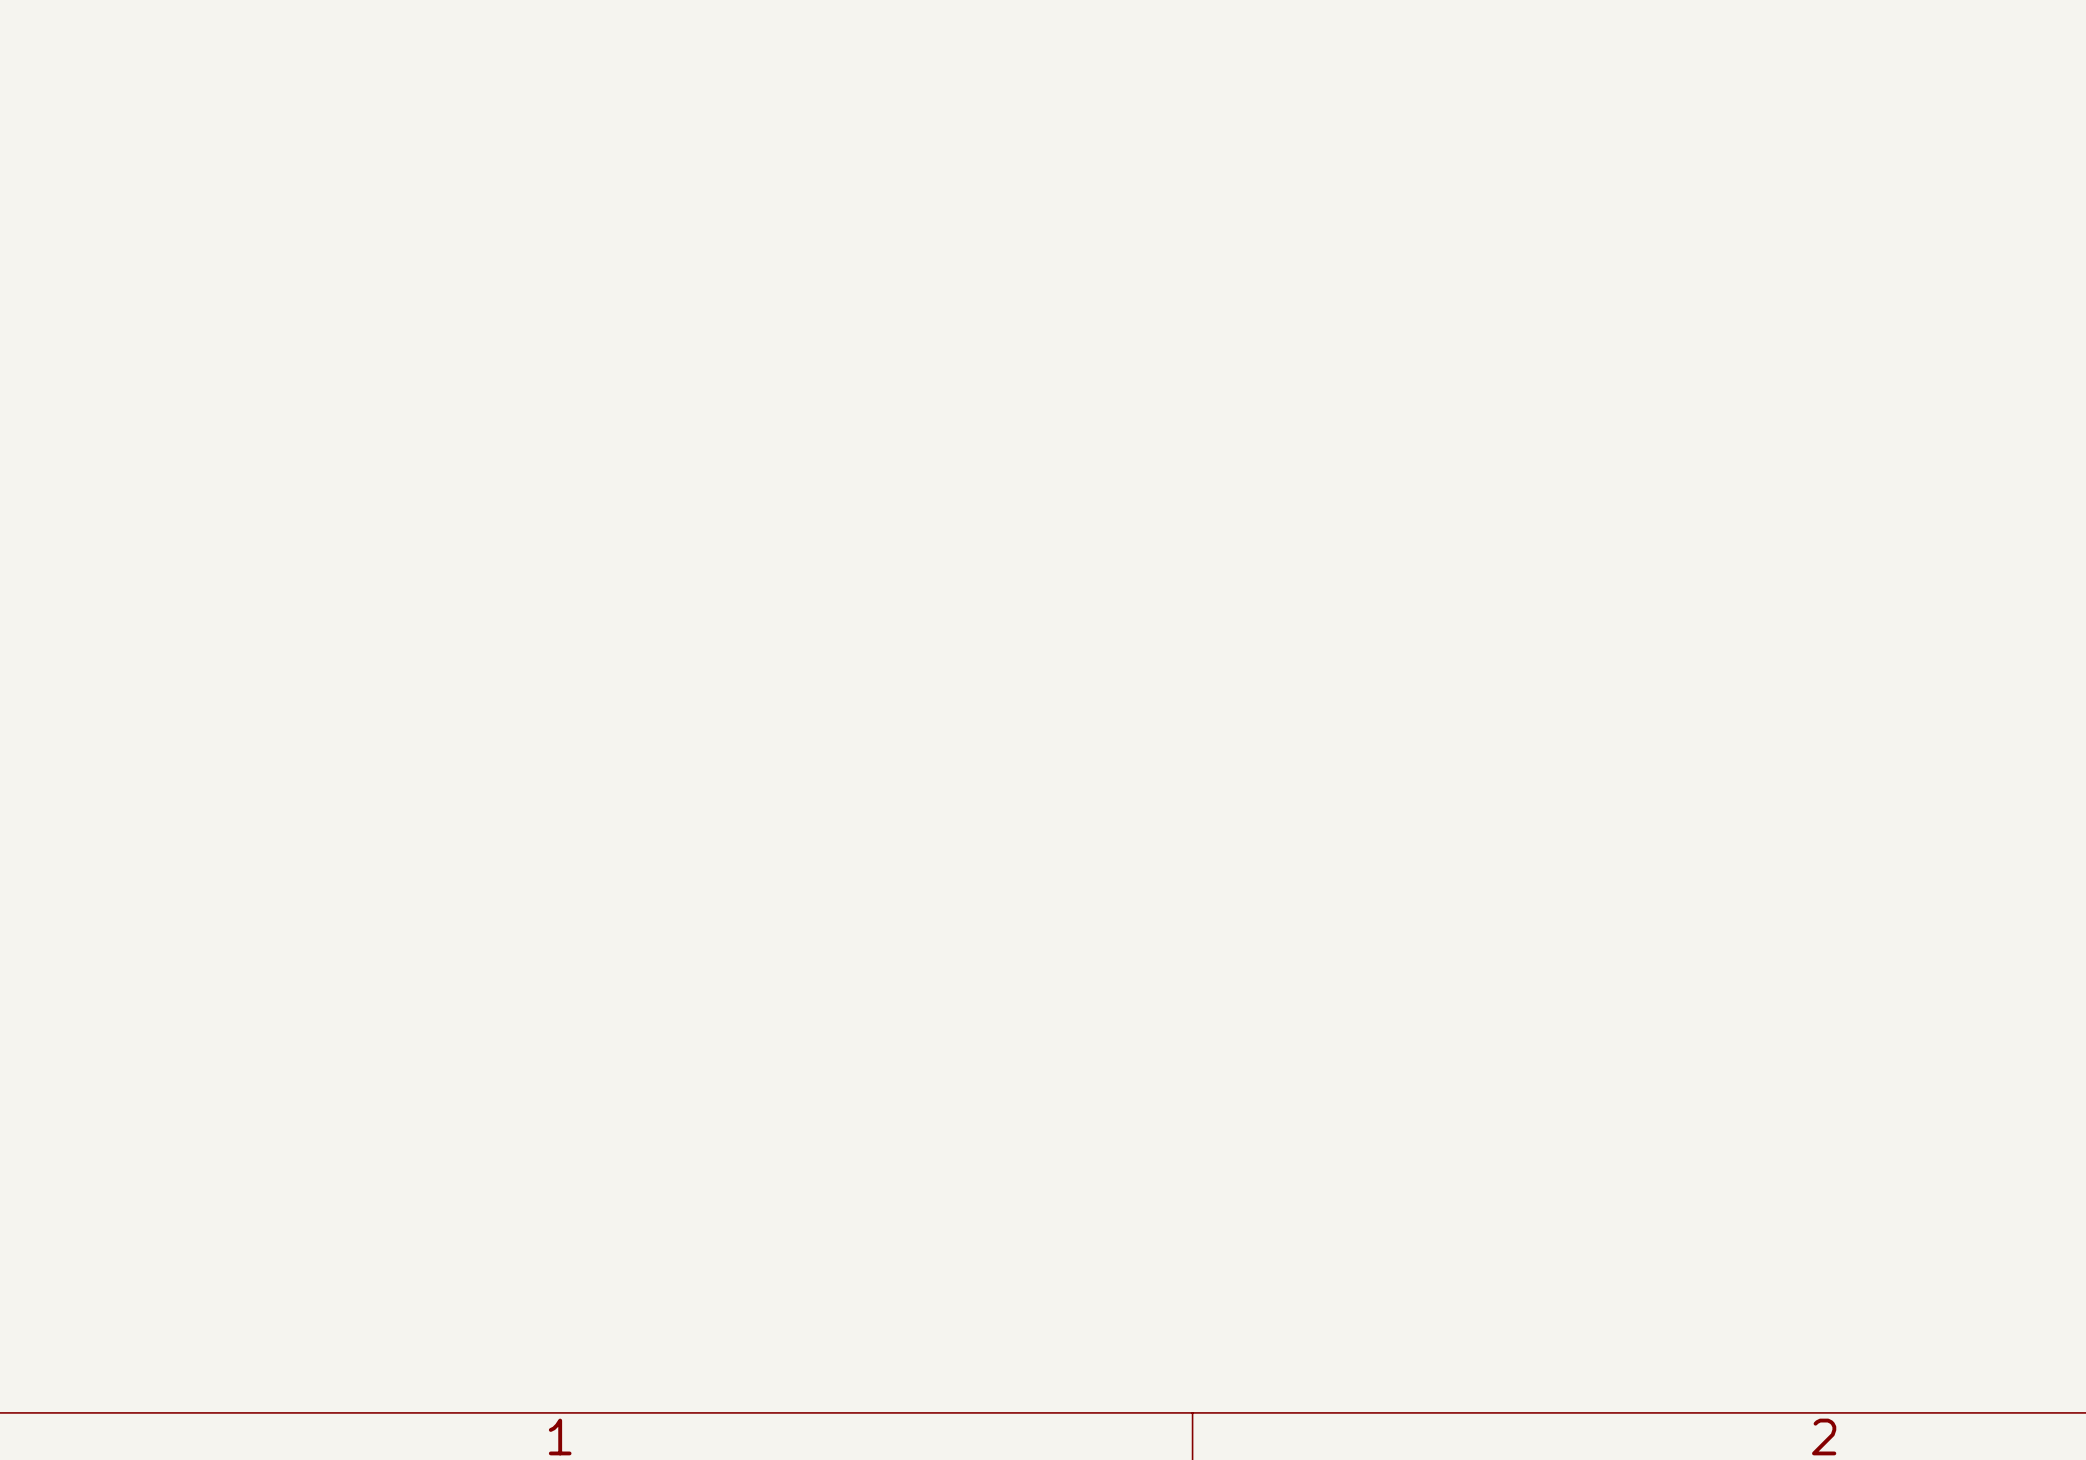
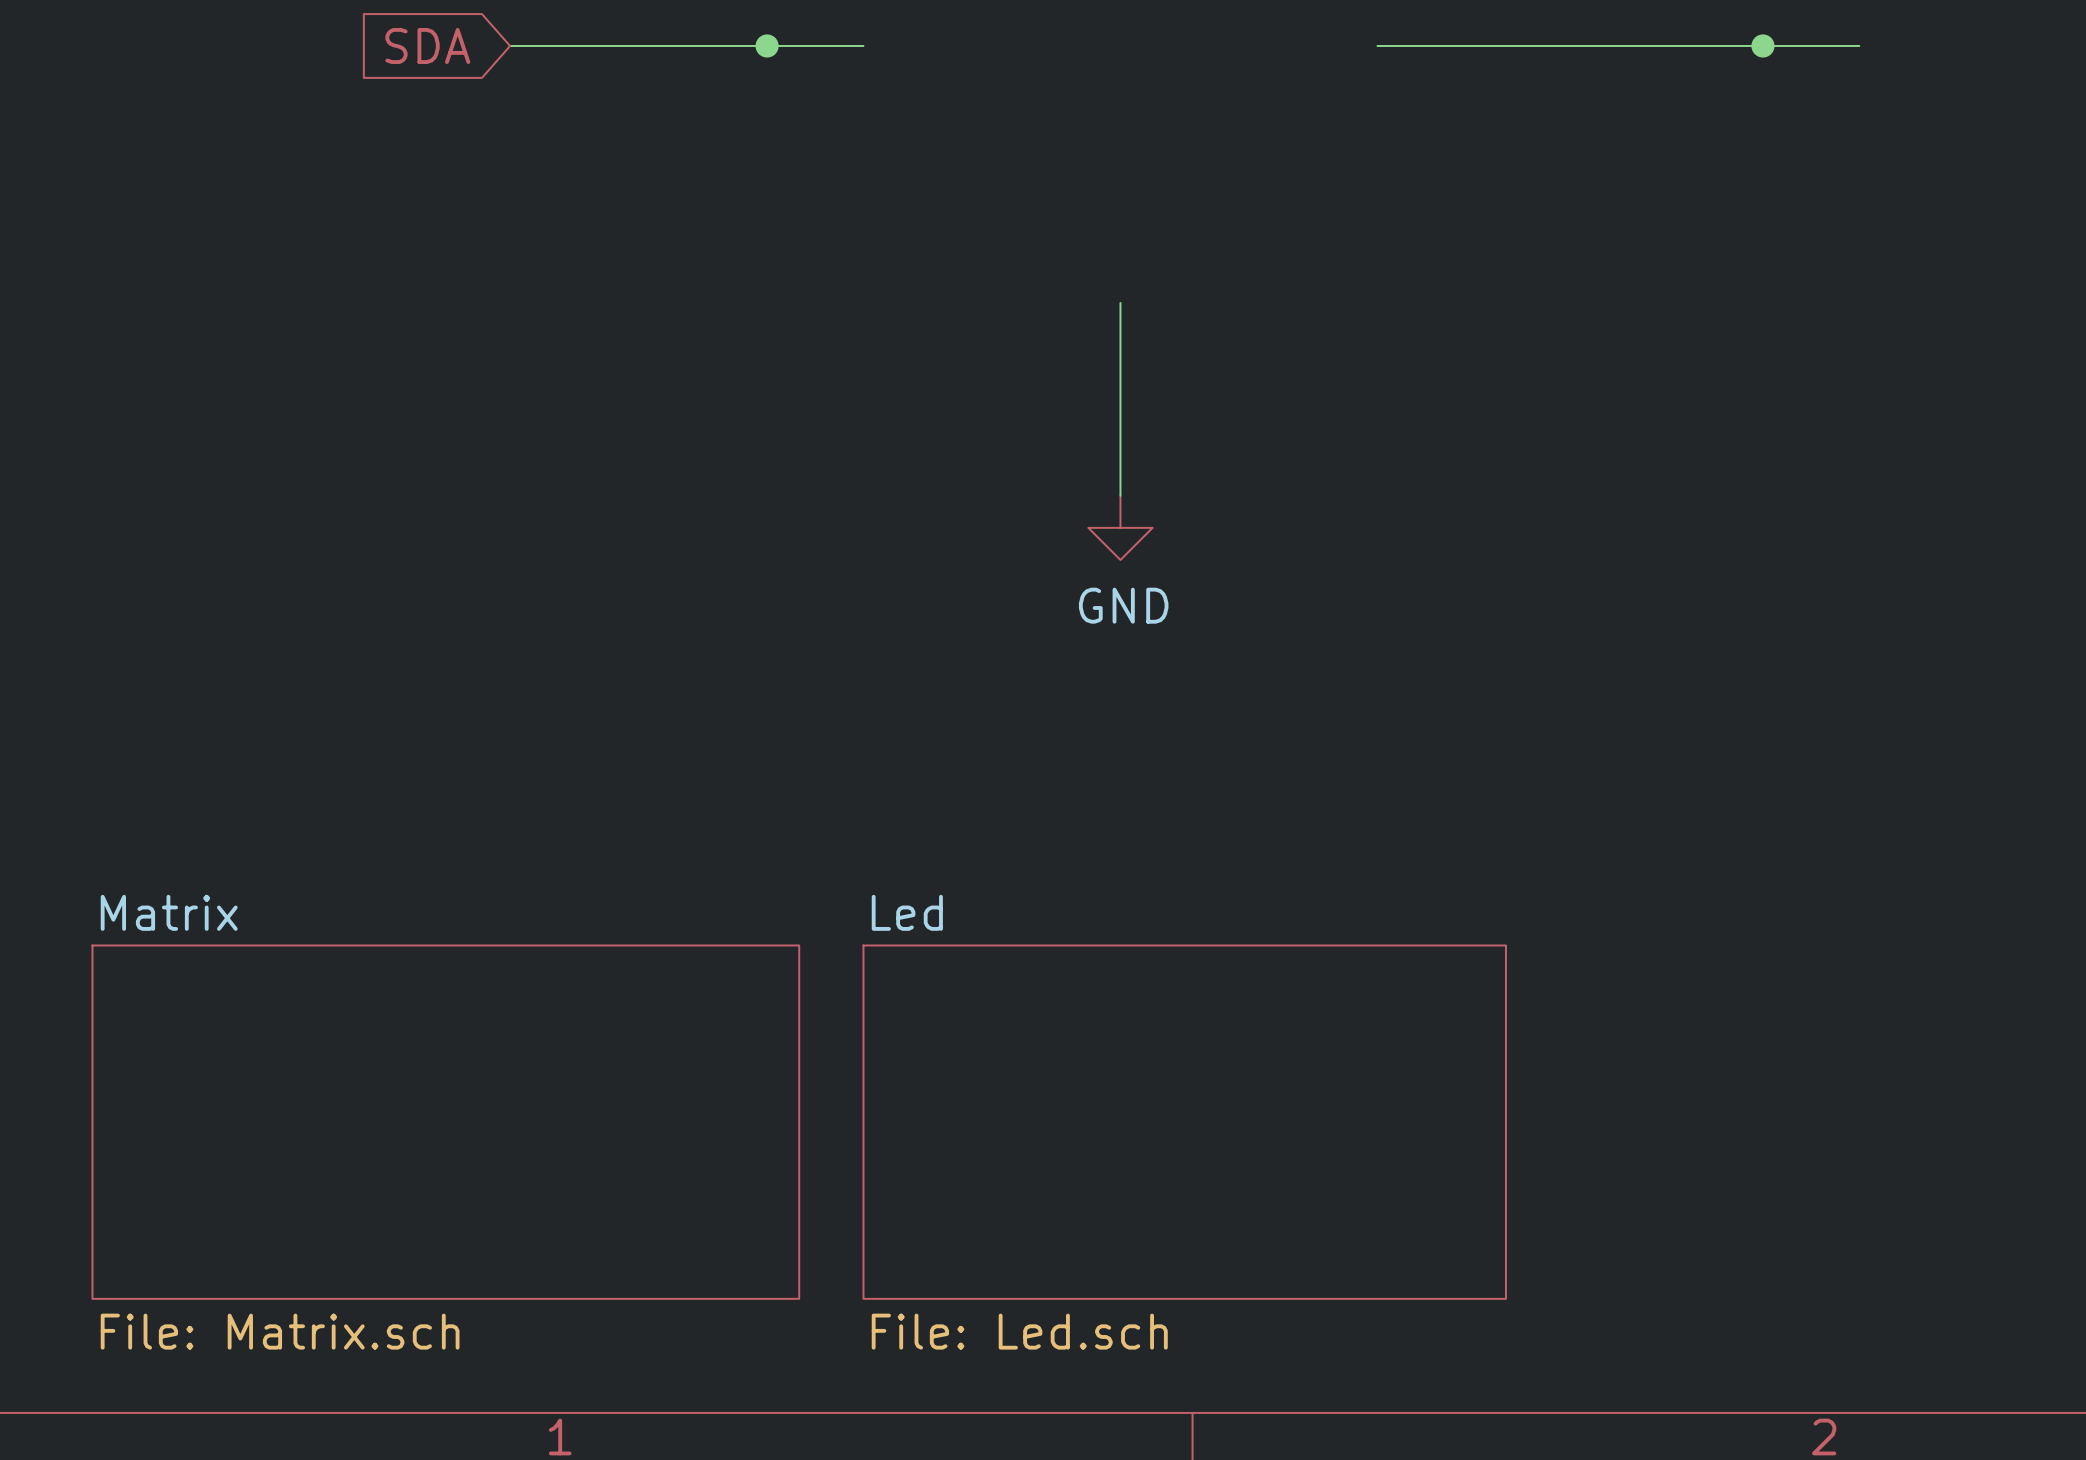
global label: none -> SDA (427, 45)
wire: none -> (510, 45) (863, 45)
junction: none -> (767, 45)
wire: none -> (1377, 45) (1859, 45)
junction: none -> (1762, 45)
wire: none -> (1120, 302) (1120, 495)
power symbol: none -> GND (1120, 527)
sheet Matrix: none -> File: Matrix.sch (445, 1122)
sheet Led: none -> File: Led.sch (1184, 1122)

